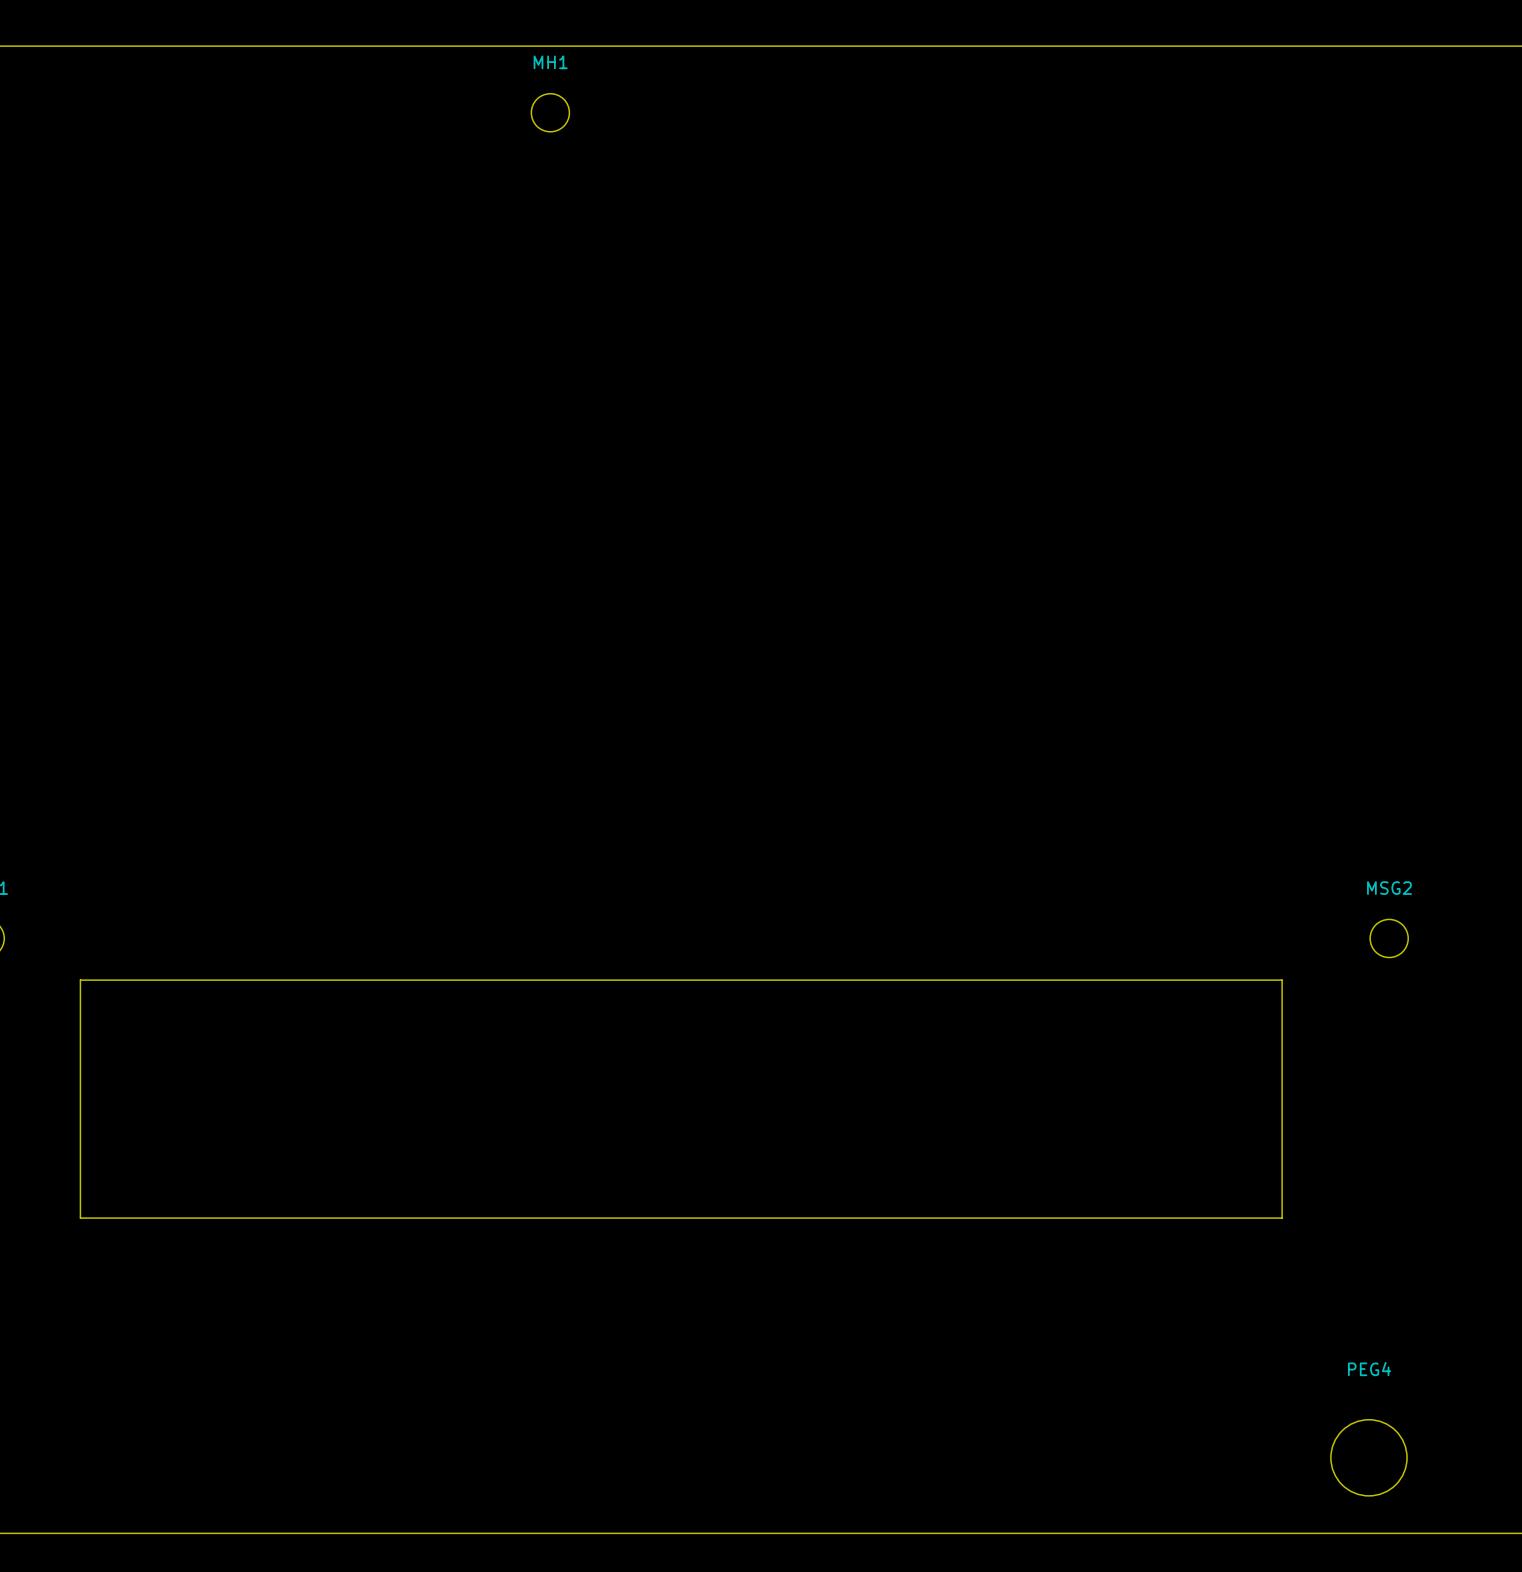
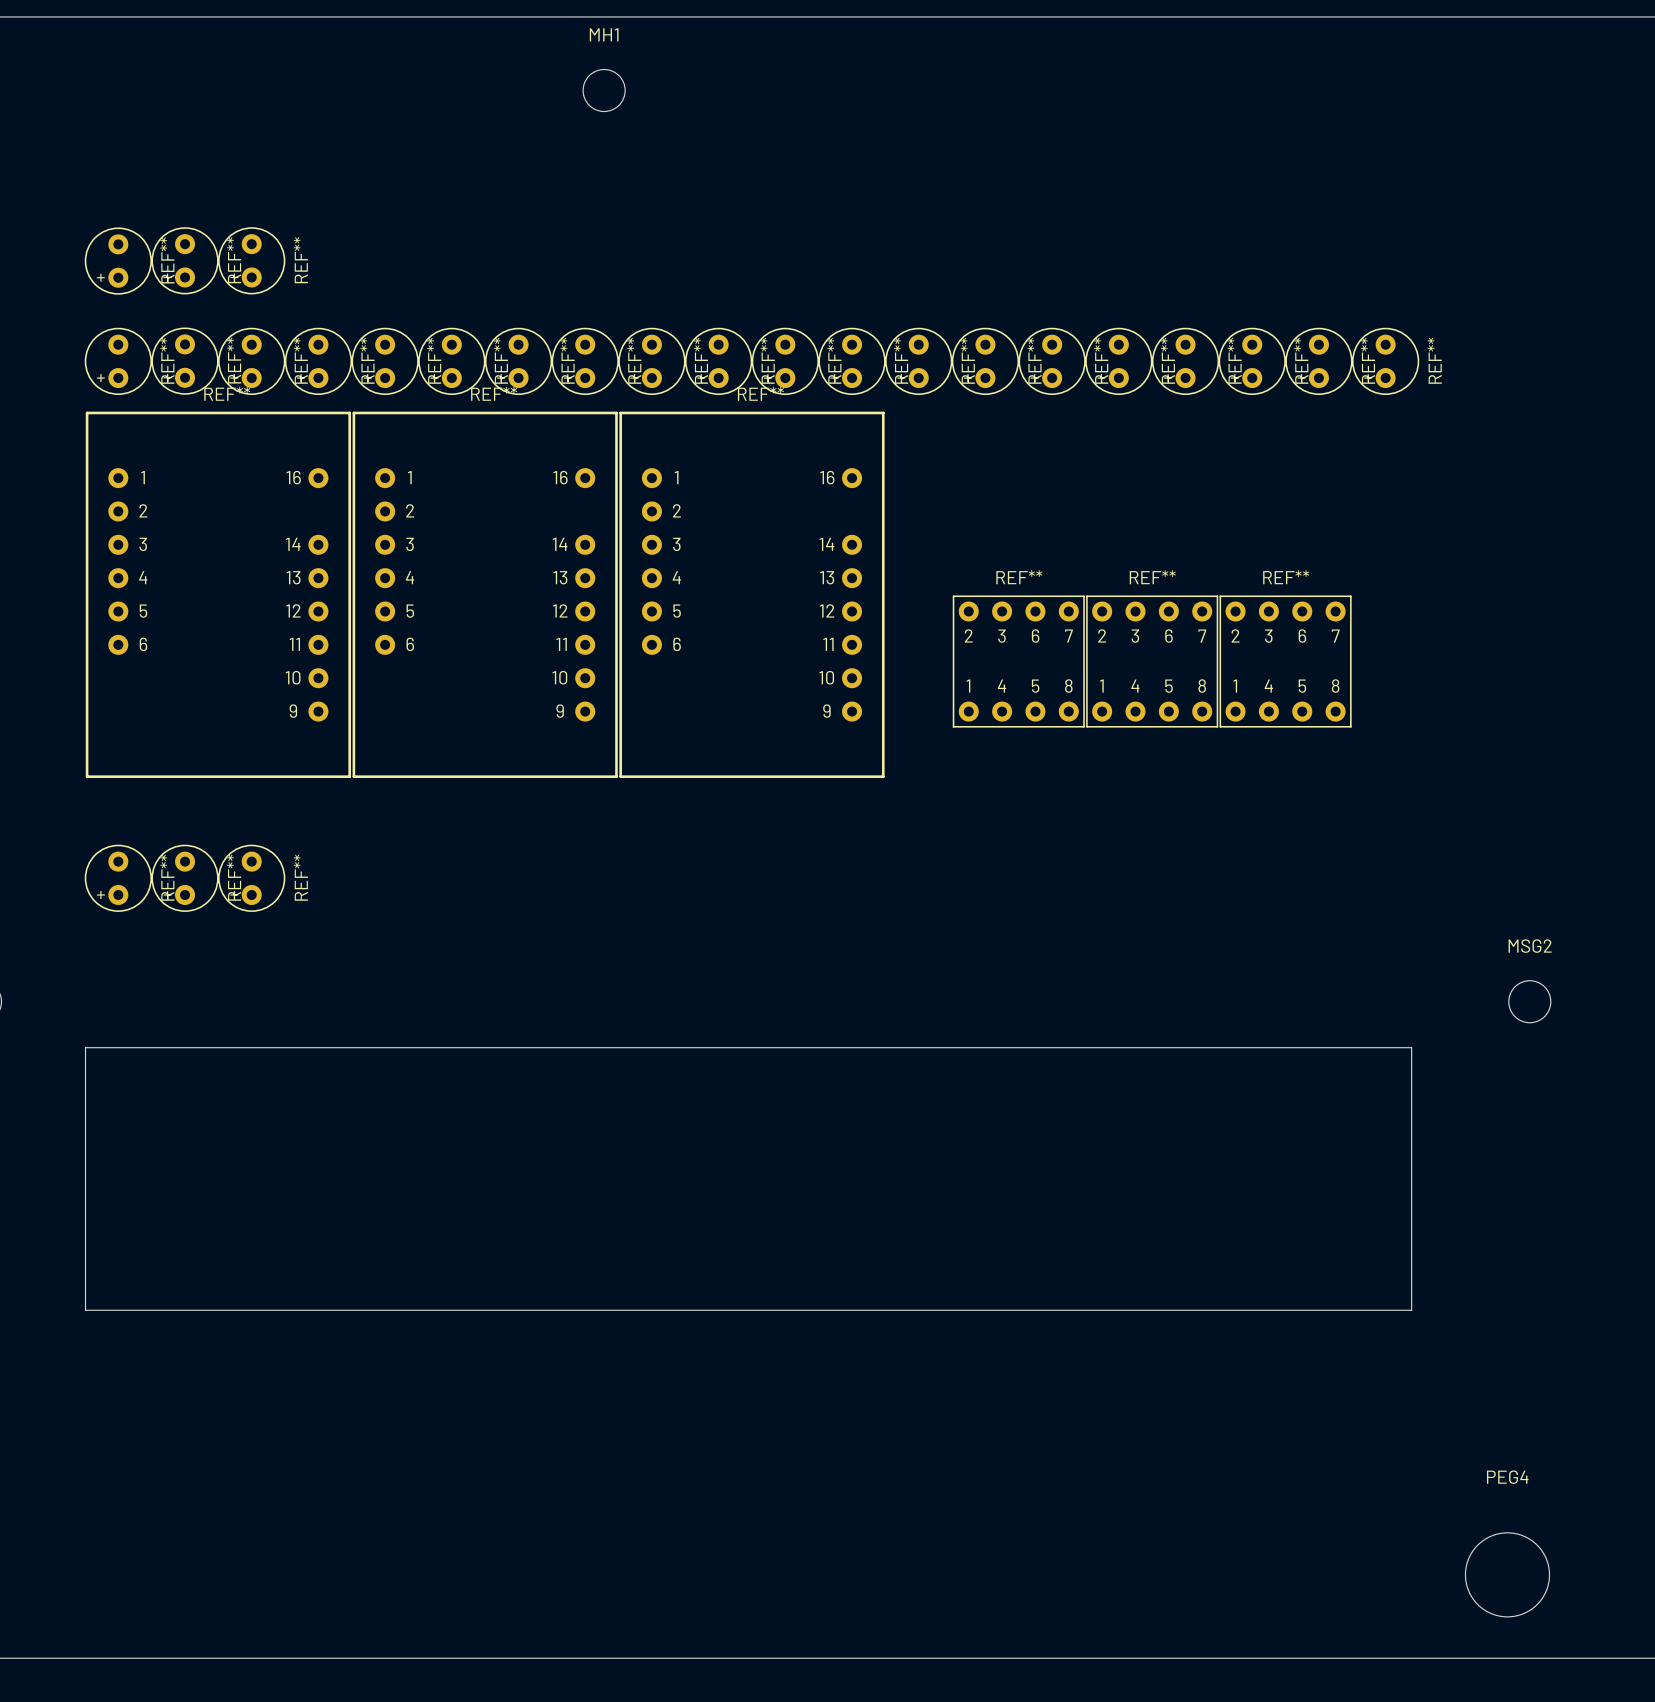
REF**: none -> (118, 261)
REF**: none -> (185, 260)
REF**: none -> (251, 260)
REF**: none -> (185, 361)
REF**: none -> (118, 361)
REF**: none -> (251, 361)
REF**: none -> (318, 361)
REF**: none -> (385, 361)
REF**: none -> (451, 361)
REF**: none -> (518, 361)
REF**: none -> (585, 361)
REF**: none -> (651, 361)
REF**: none -> (718, 361)
REF**: none -> (785, 361)
REF**: none -> (852, 361)
REF**: none -> (918, 361)
REF**: none -> (985, 361)
REF**: none -> (1052, 361)
REF**: none -> (1118, 361)
REF**: none -> (1185, 361)
REF**: none -> (1252, 361)
REF**: none -> (1318, 361)
REF**: none -> (1385, 361)
REF**: none -> (218, 594)
REF**: none -> (485, 594)
REF**: none -> (751, 594)
REF**: none -> (1018, 661)
REF**: none -> (1152, 661)
REF**: none -> (1285, 661)
REF**: none -> (118, 878)
REF**: none -> (185, 878)
REF**: none -> (251, 878)

